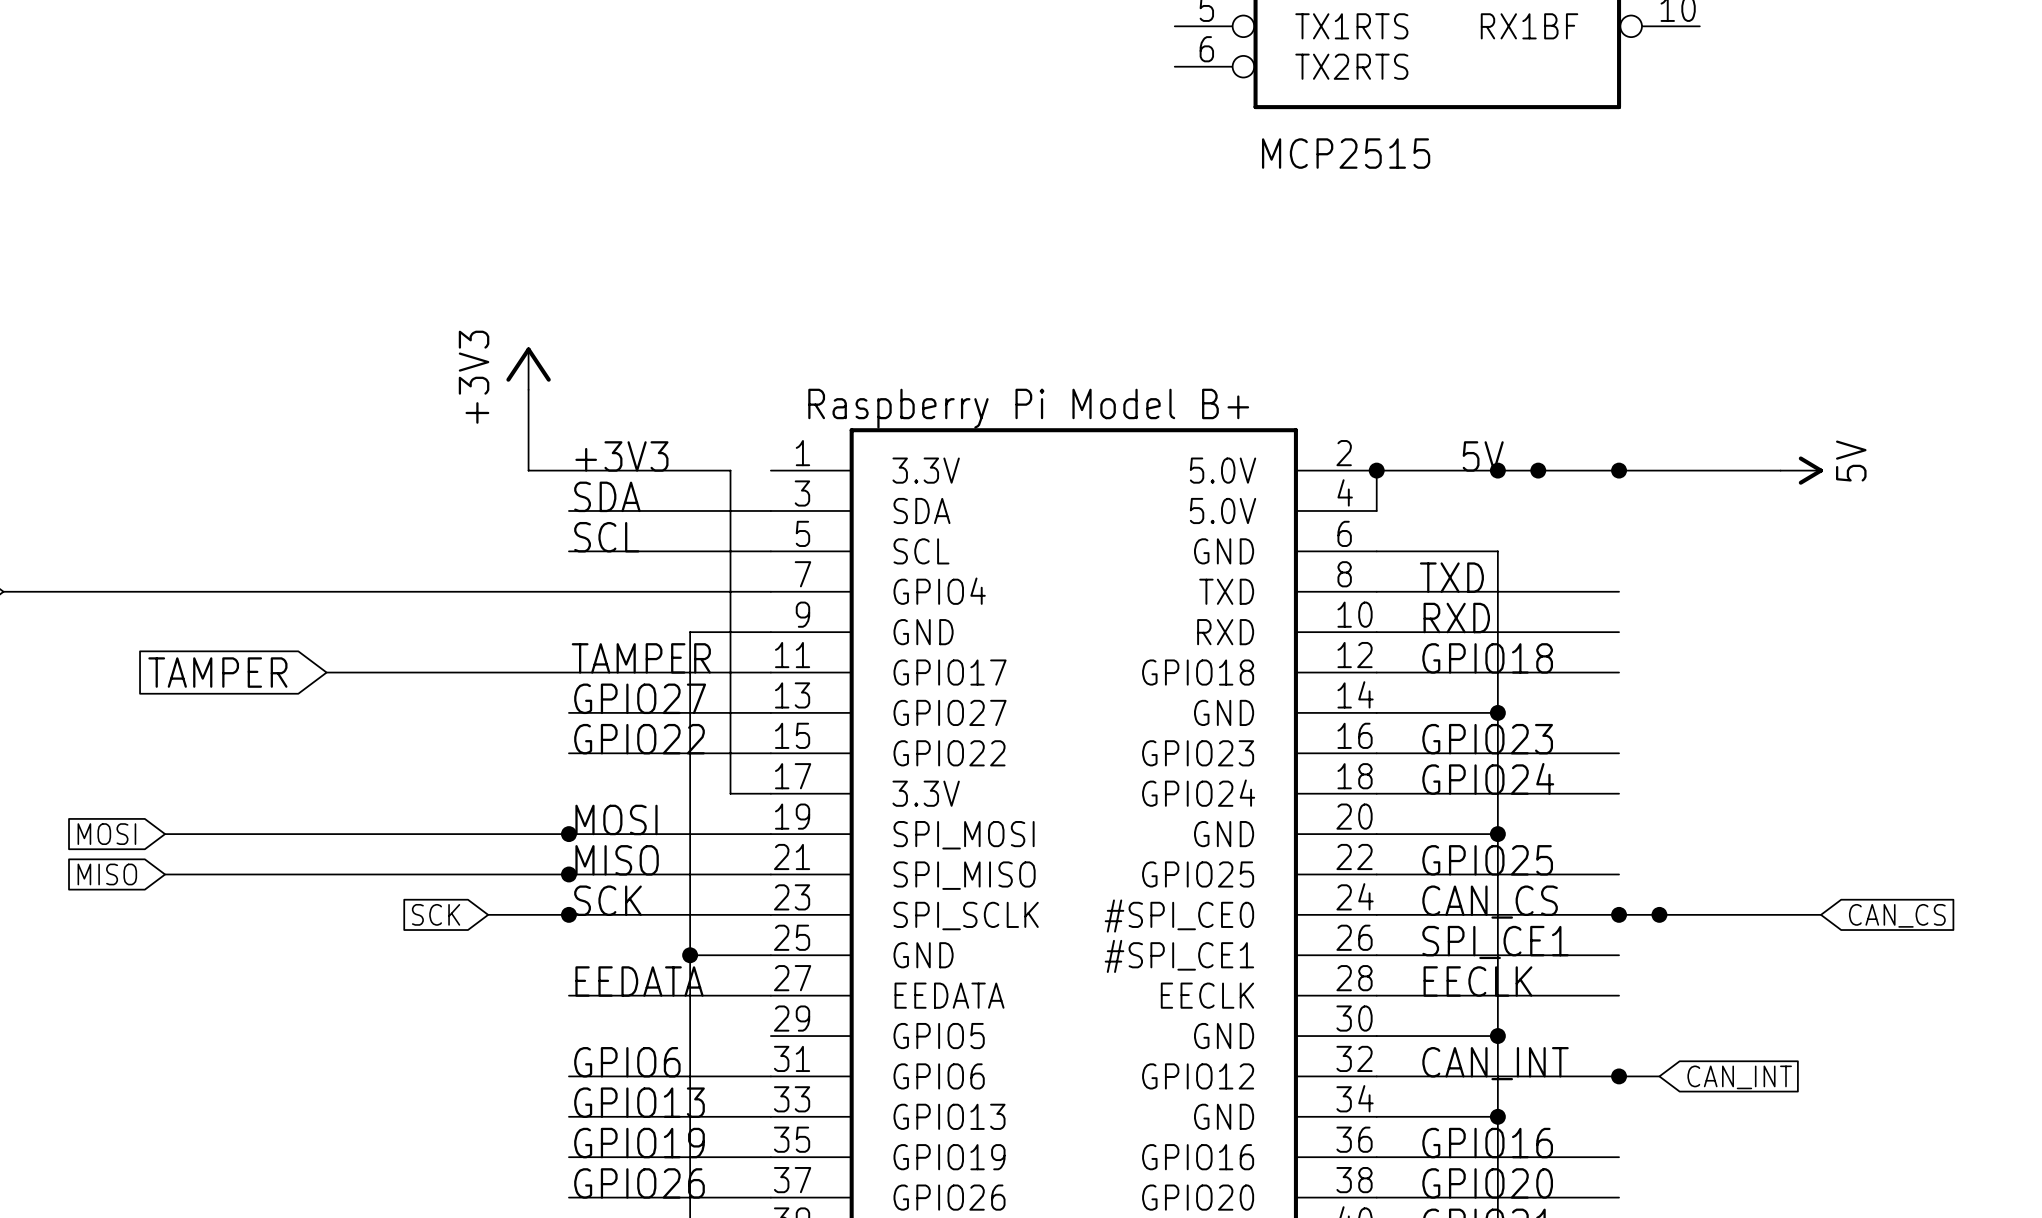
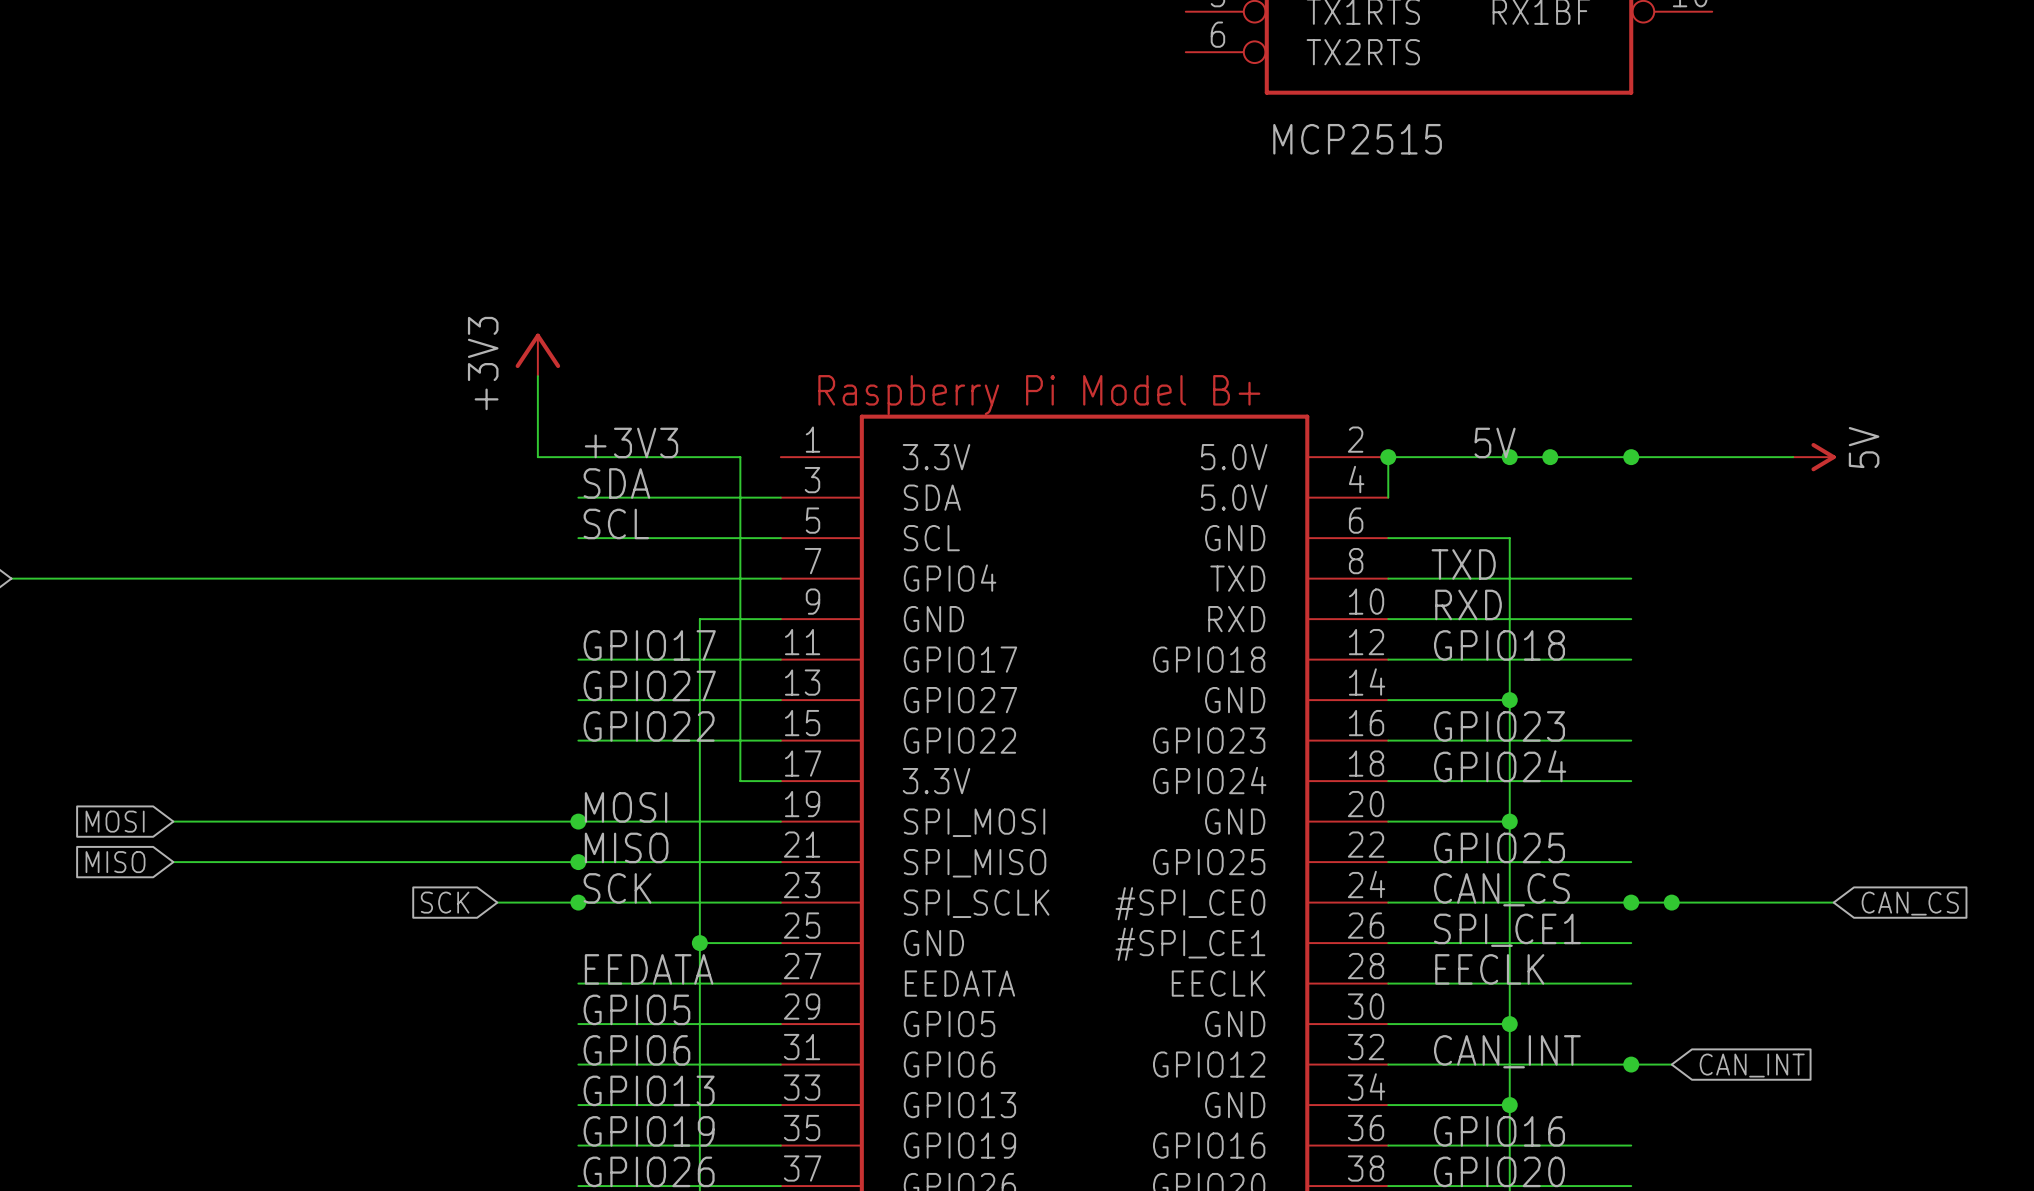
label: TAMPER (641, 658) -> GPIO17 (649, 645)
global label: TAMPER (217, 672) -> none
wire: (326, 672) (568, 672) -> none
label: none -> GPIO5 (636, 1009)
wire: none -> (578, 1024) (780, 1024)

